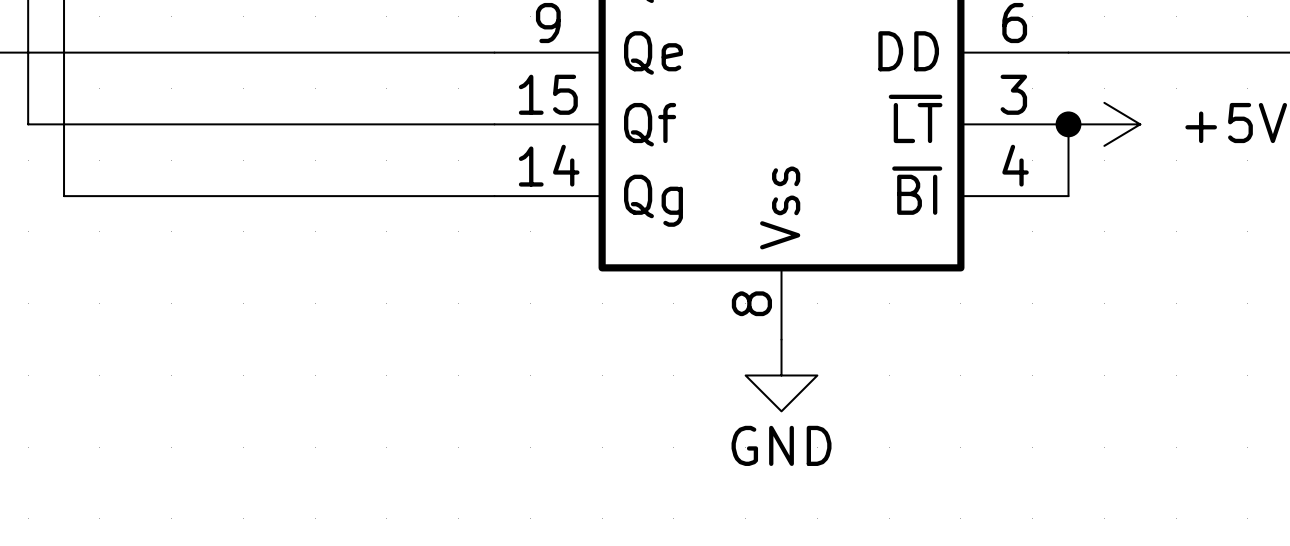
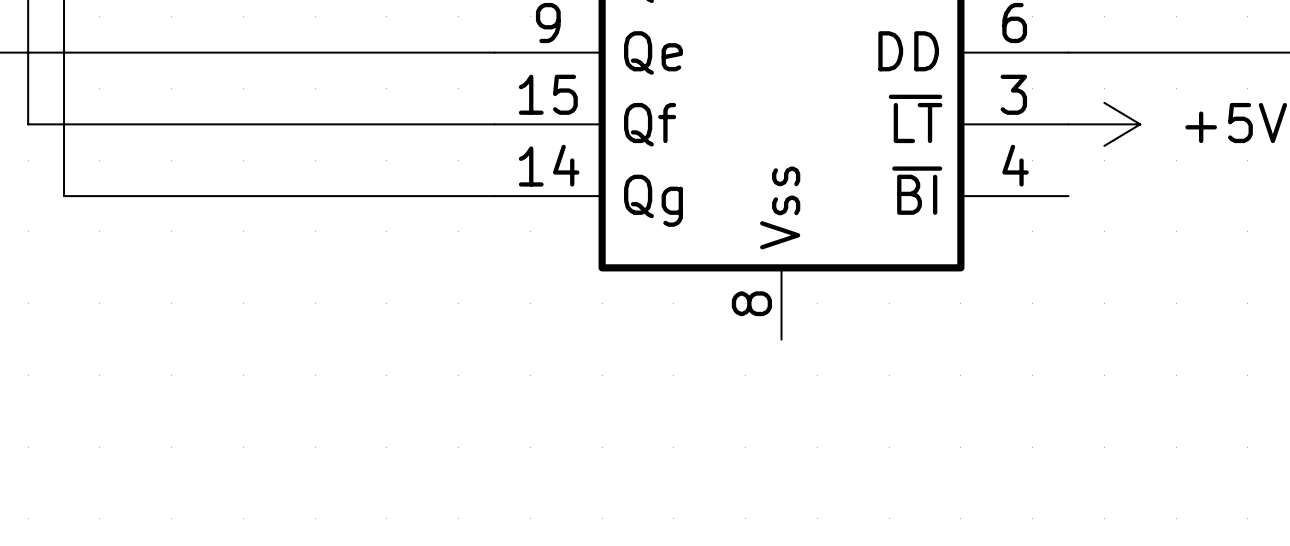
wire: (1068, 124) (1068, 196) -> none
junction: (1068, 124) -> none
power symbol: GND (781, 375) -> none

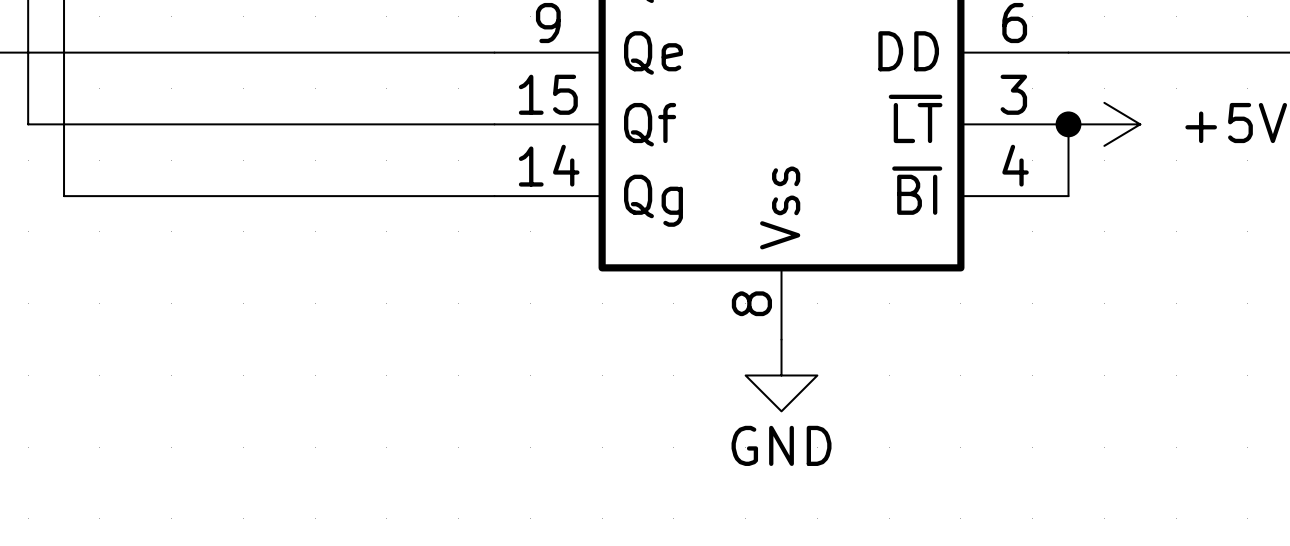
wire: none -> (1068, 124) (1068, 196)
junction: none -> (1068, 124)
power symbol: none -> GND (781, 375)

